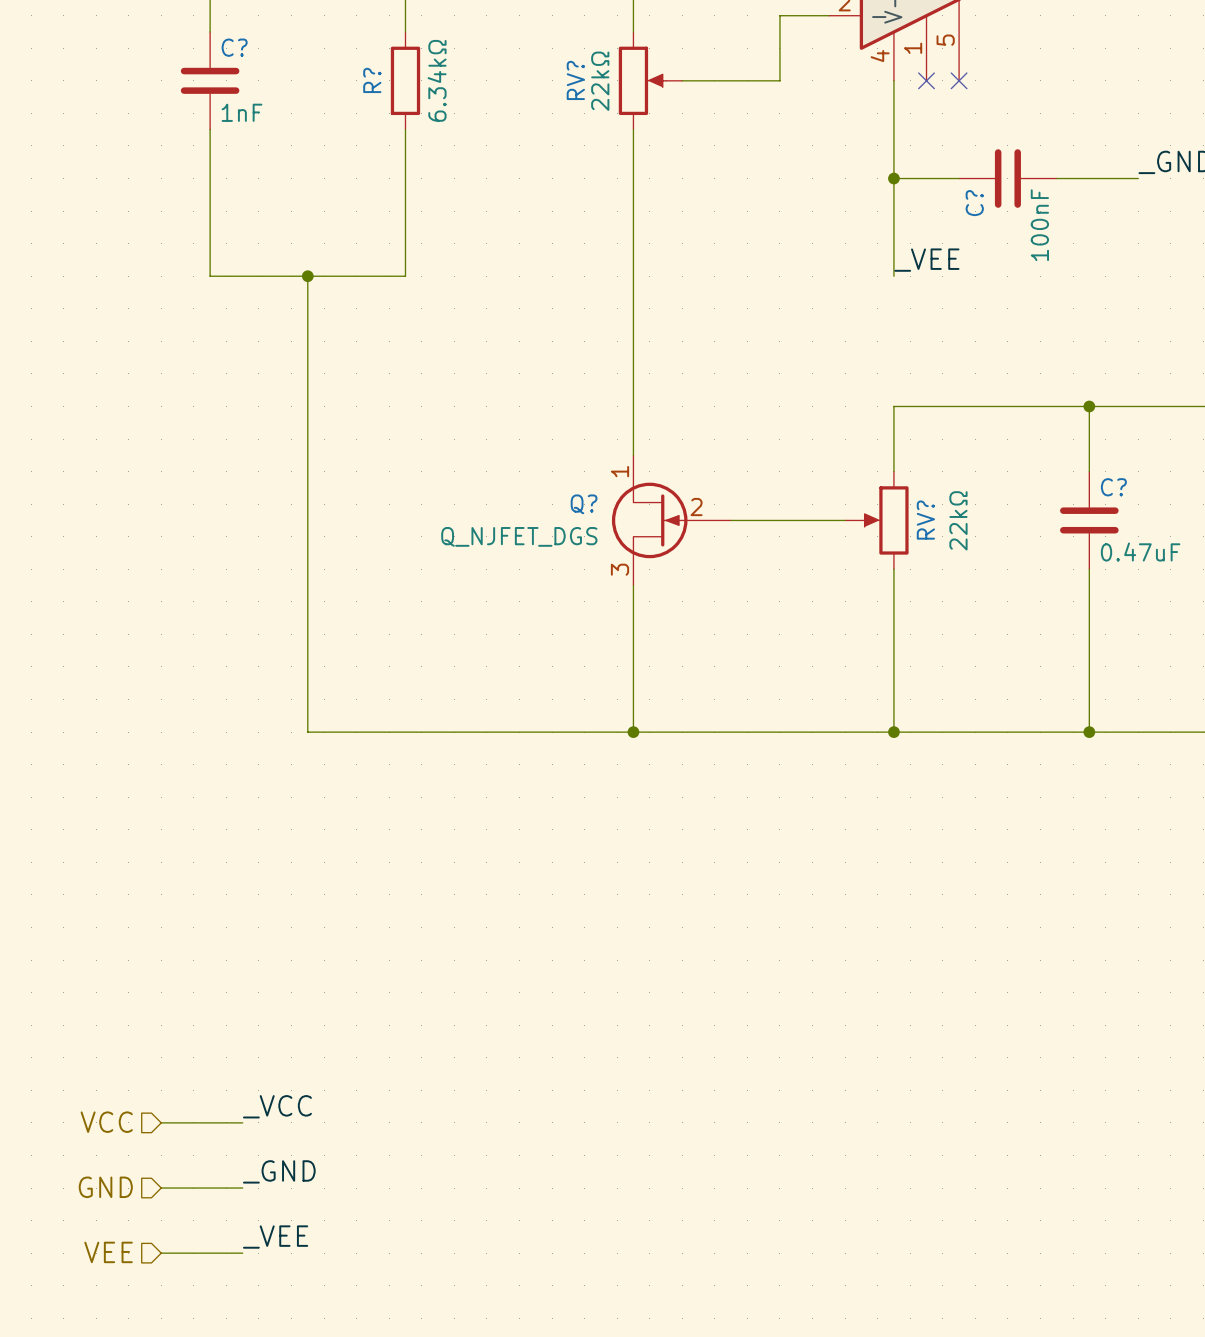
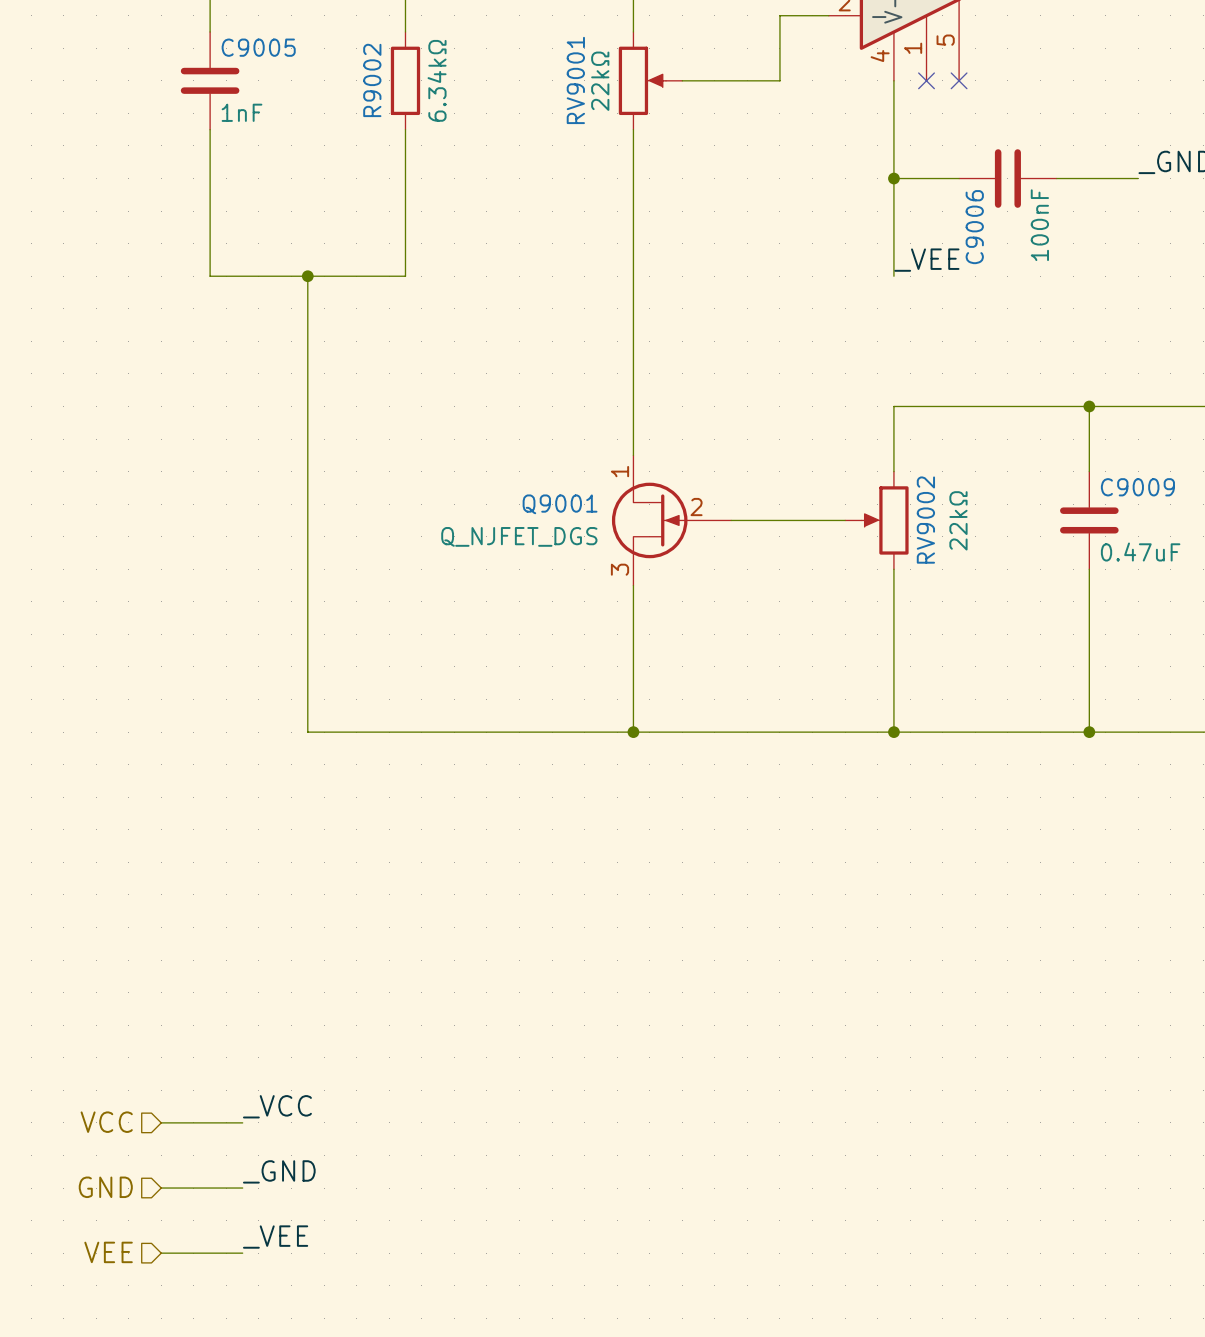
C? name: C? (234, 47) -> C9005 (258, 47)
R? name: R? (372, 80) -> R9002 (372, 80)
RV? name: RV? (575, 80) -> RV9001 (575, 80)
C? name: C? (974, 203) -> C9006 (974, 227)
C? name: C? (1113, 487) -> C9009 (1137, 487)
Q? name: Q? (584, 504) -> Q9001 (560, 504)
RV? name: RV? (925, 520) -> RV9002 (925, 520)

